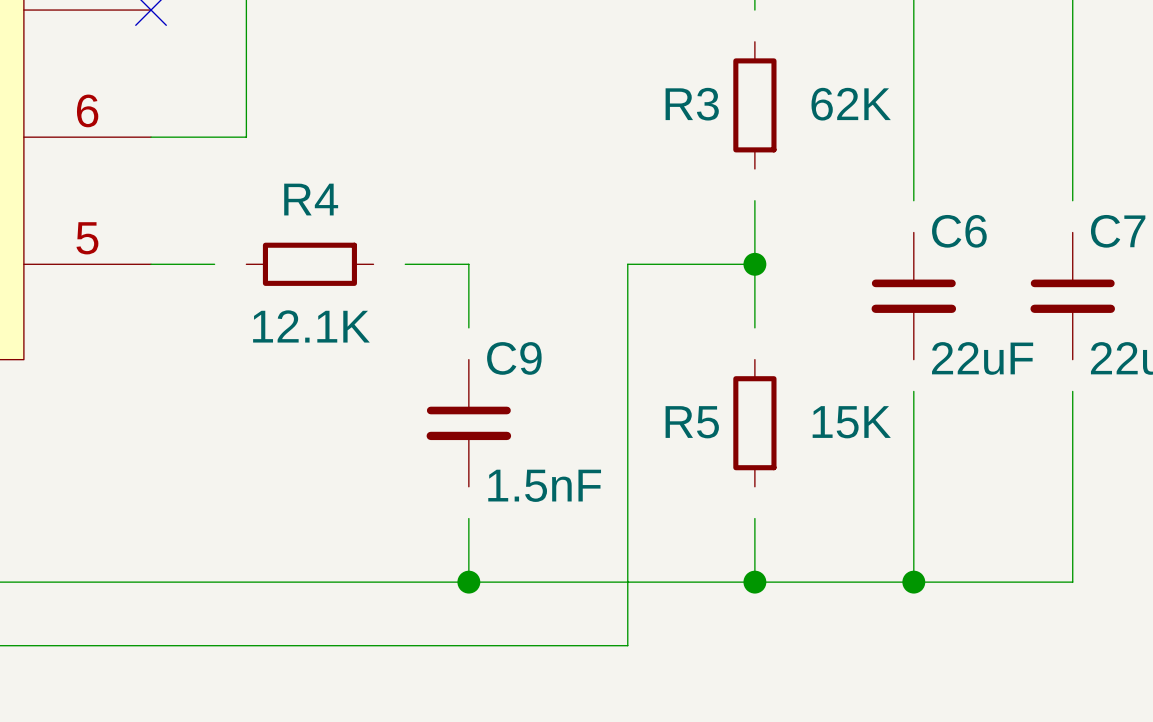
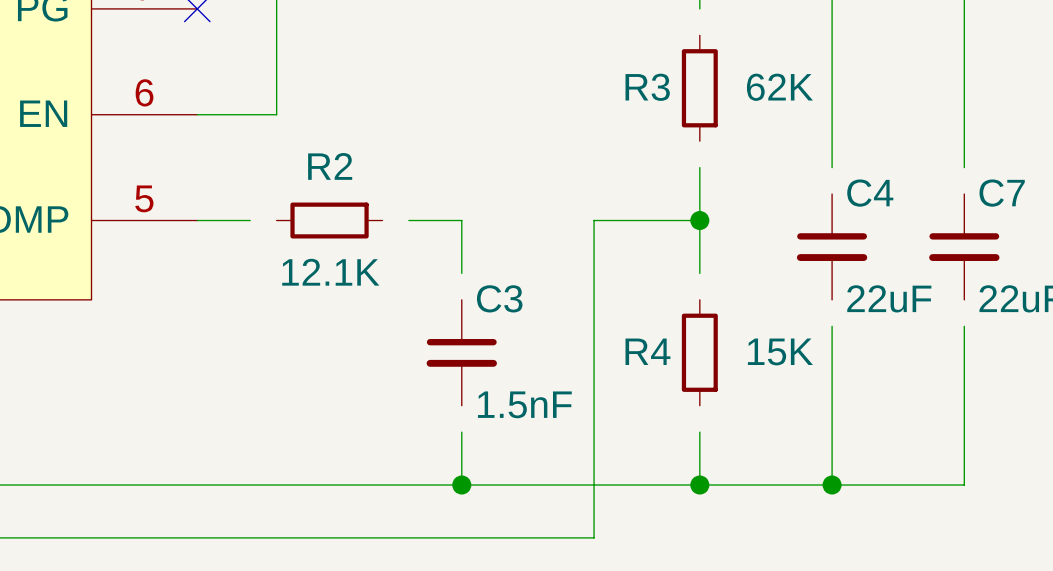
R4 name: R4 (311, 199) -> R2 (330, 166)
C6 name: C6 (959, 231) -> C4 (870, 193)
C9 name: C9 (514, 358) -> C3 (499, 298)
R5 name: R5 (692, 422) -> R4 (647, 351)

